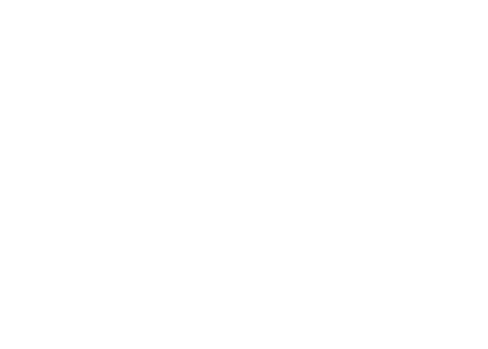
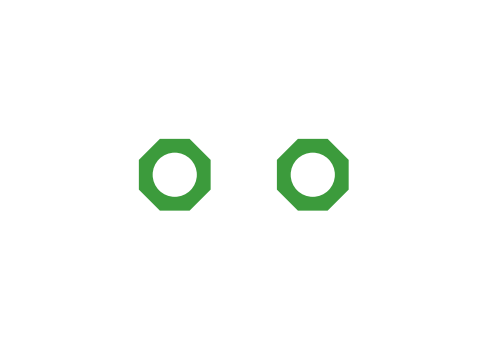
part: none -> (243, 174)

